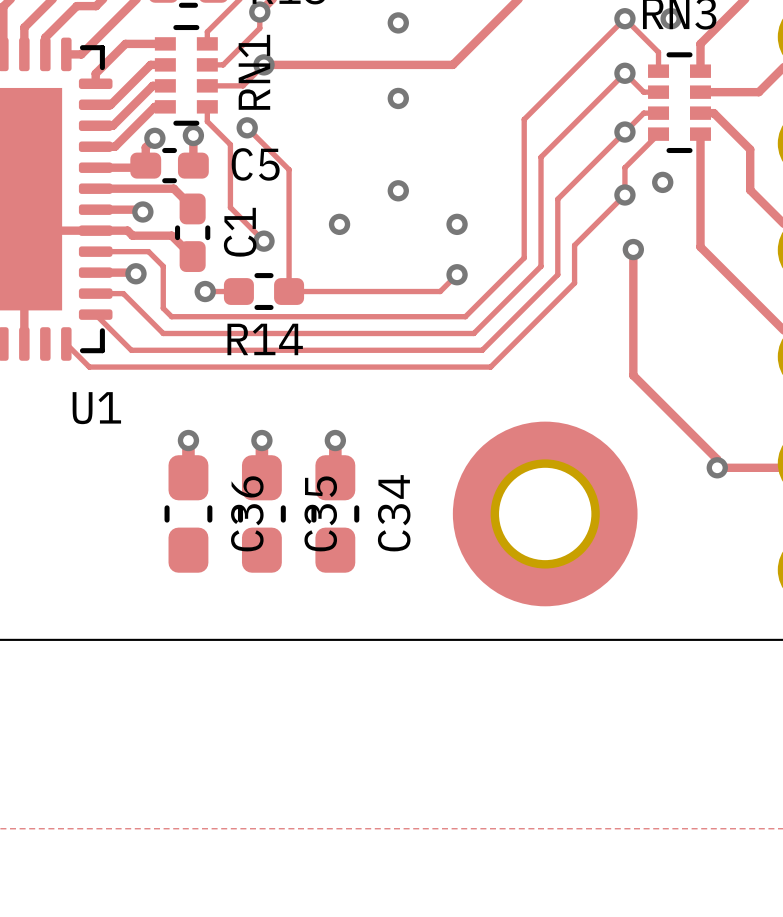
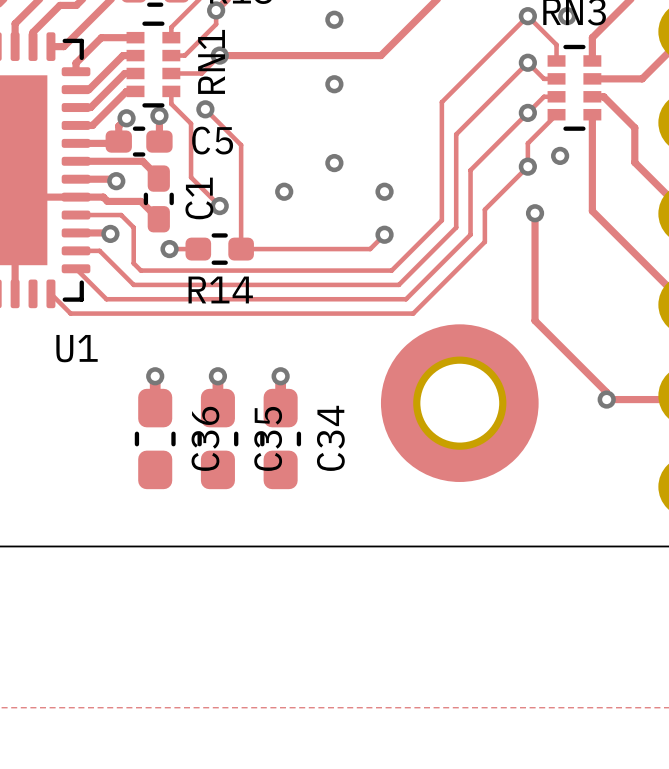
part position: (545, 513) -> (459, 403)

